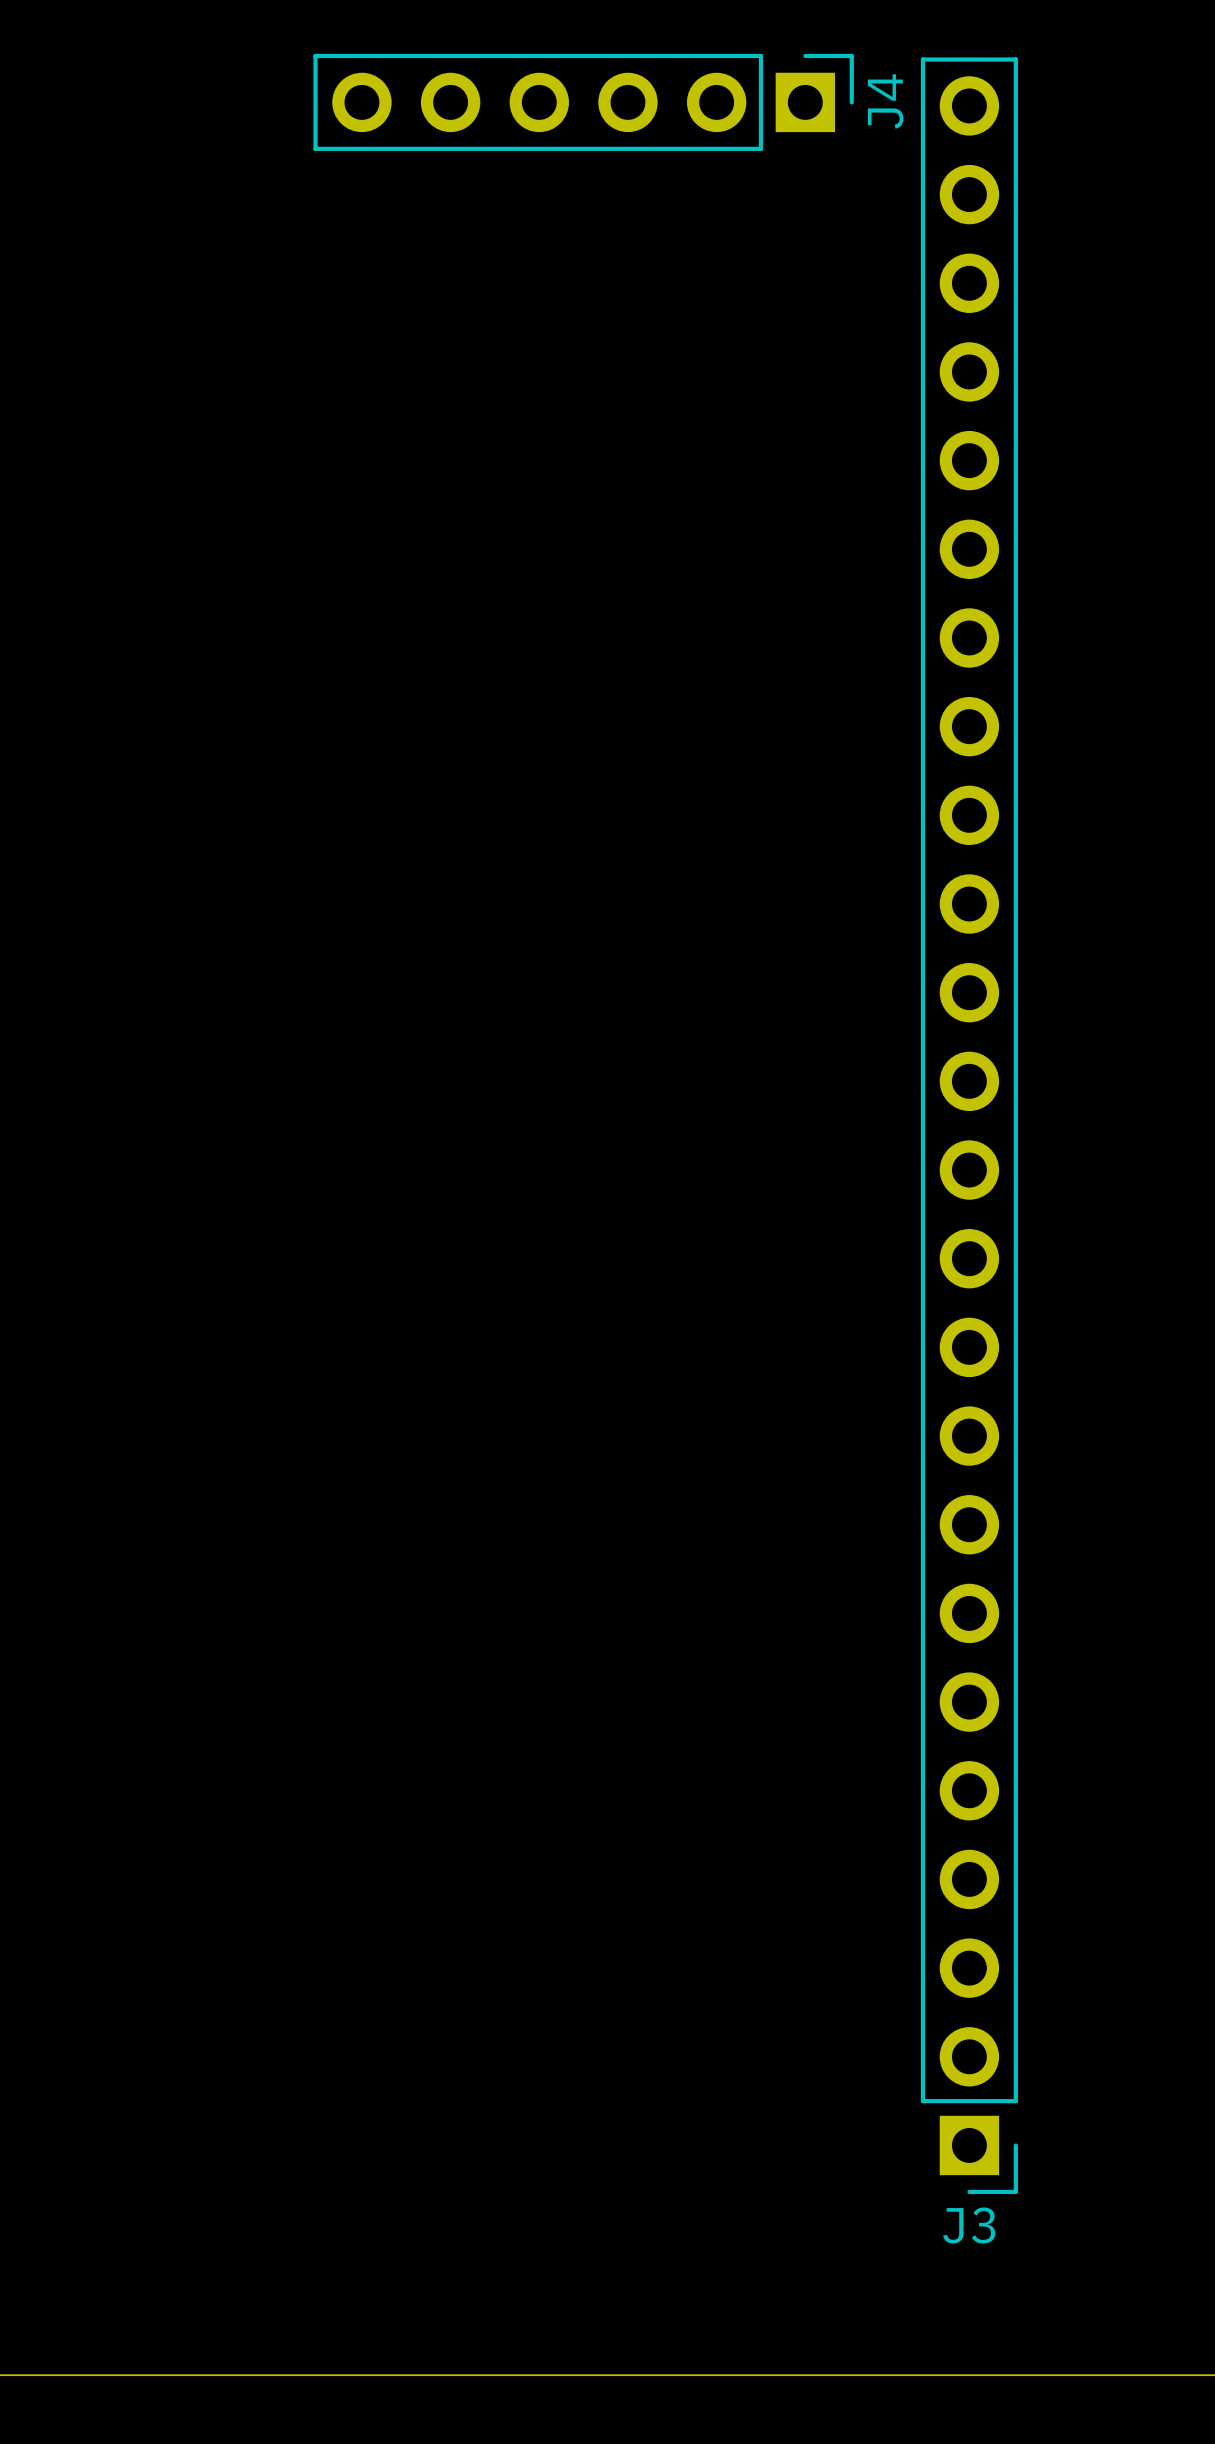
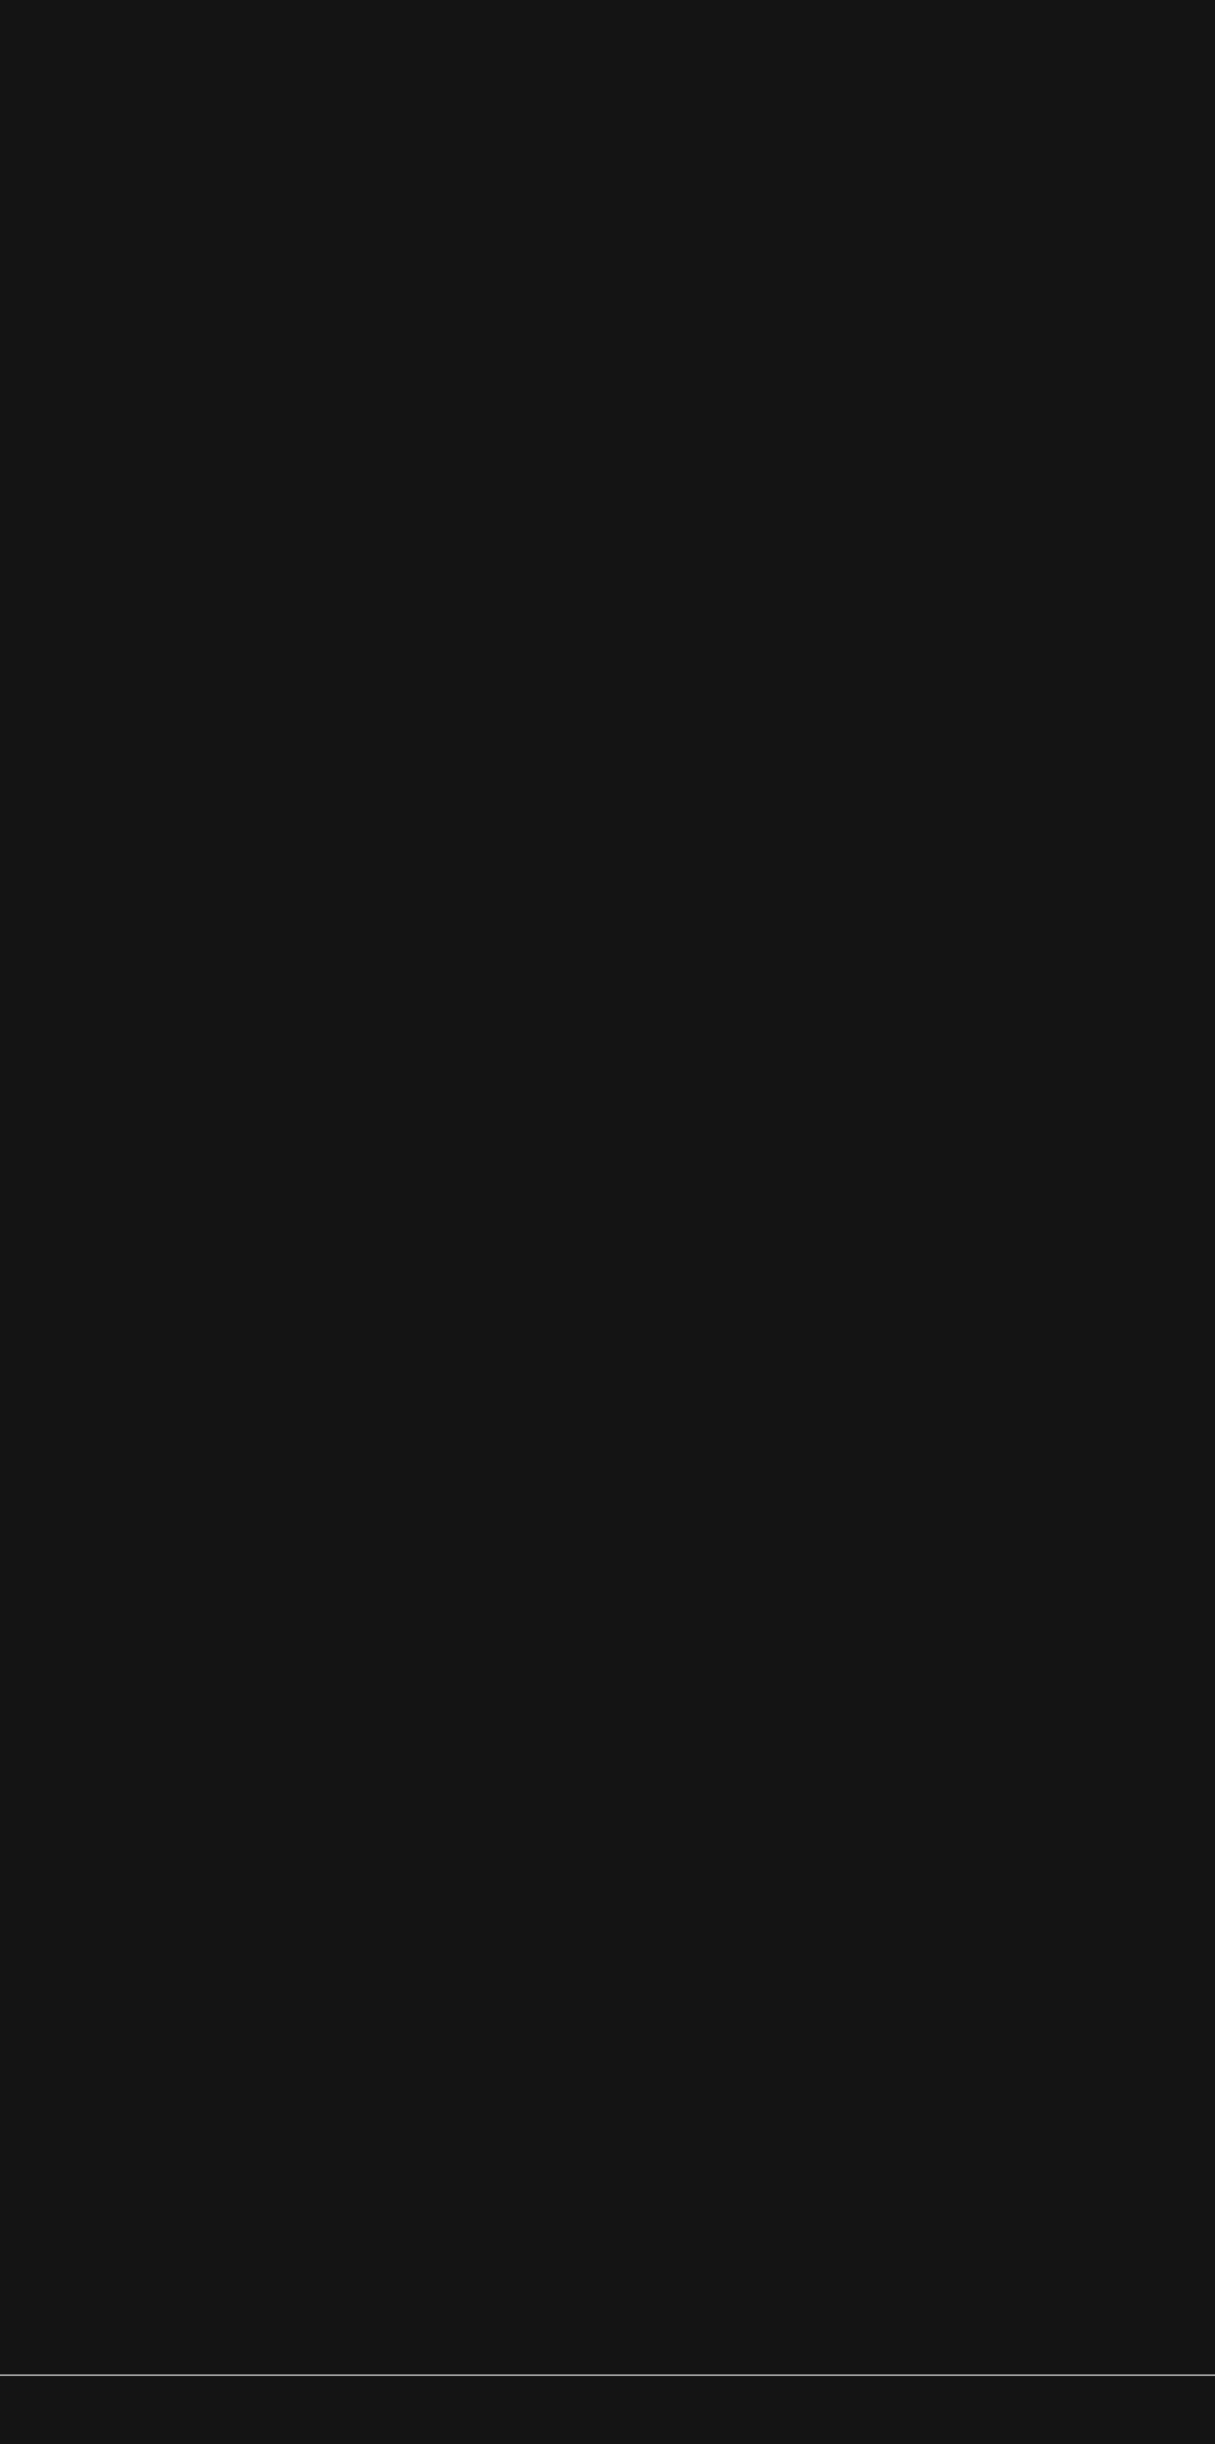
J4: (583, 102) -> none
J3: (969, 1125) -> none

